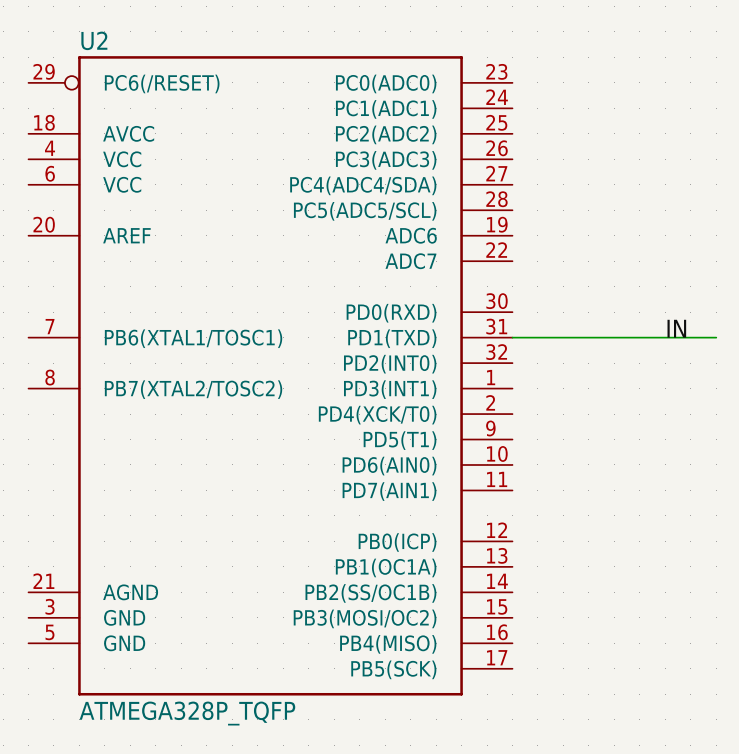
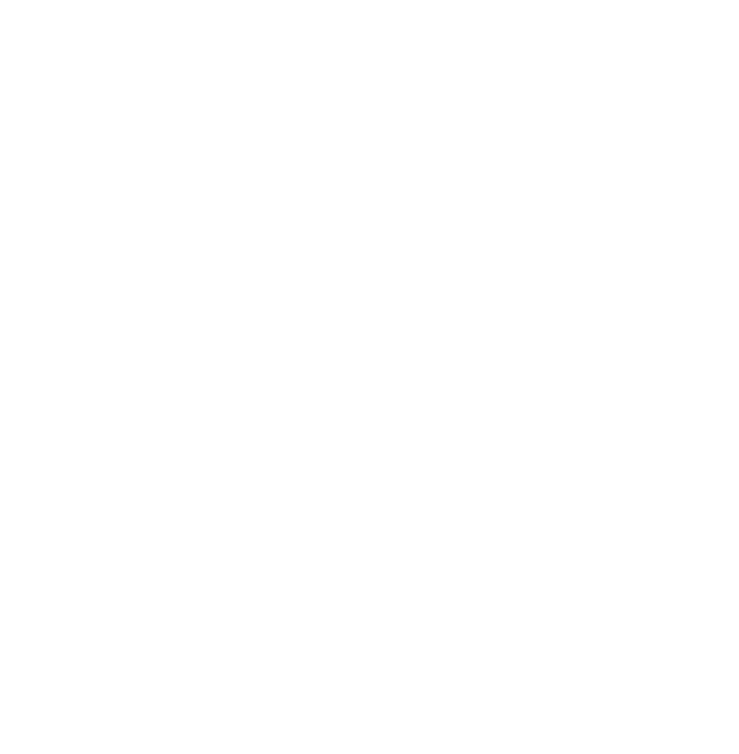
label: IN (676, 328) -> none
wire: (512, 337) (716, 337) -> none
U2: ATMEGA328P_TQFP (270, 375) -> none

